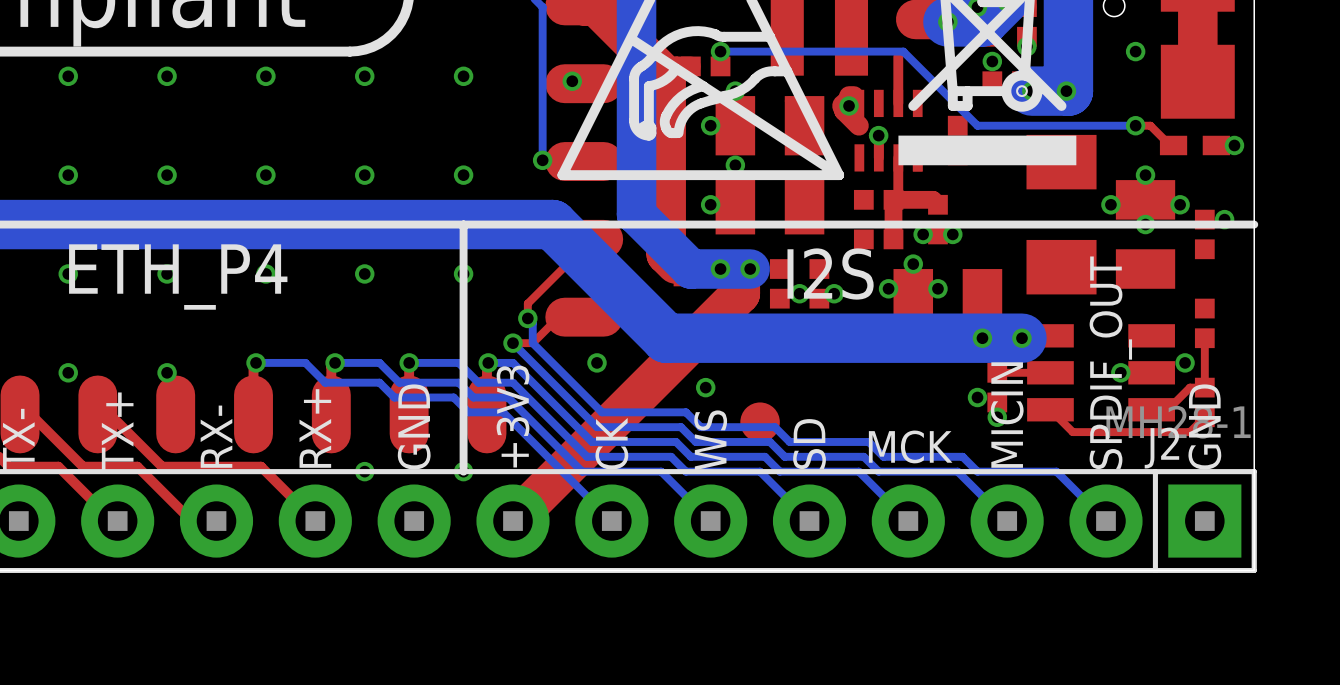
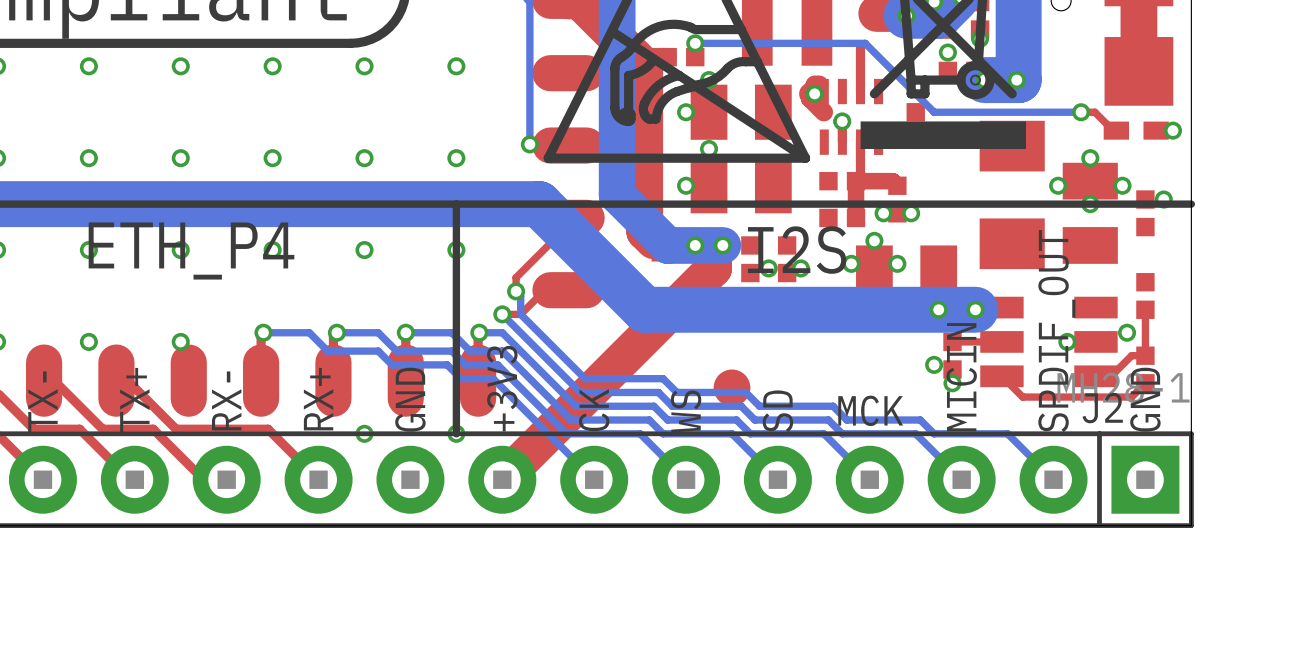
via: (1135, 51) -> none
via: (572, 81) -> none
via: (597, 362) -> none
via: (705, 387) -> none

